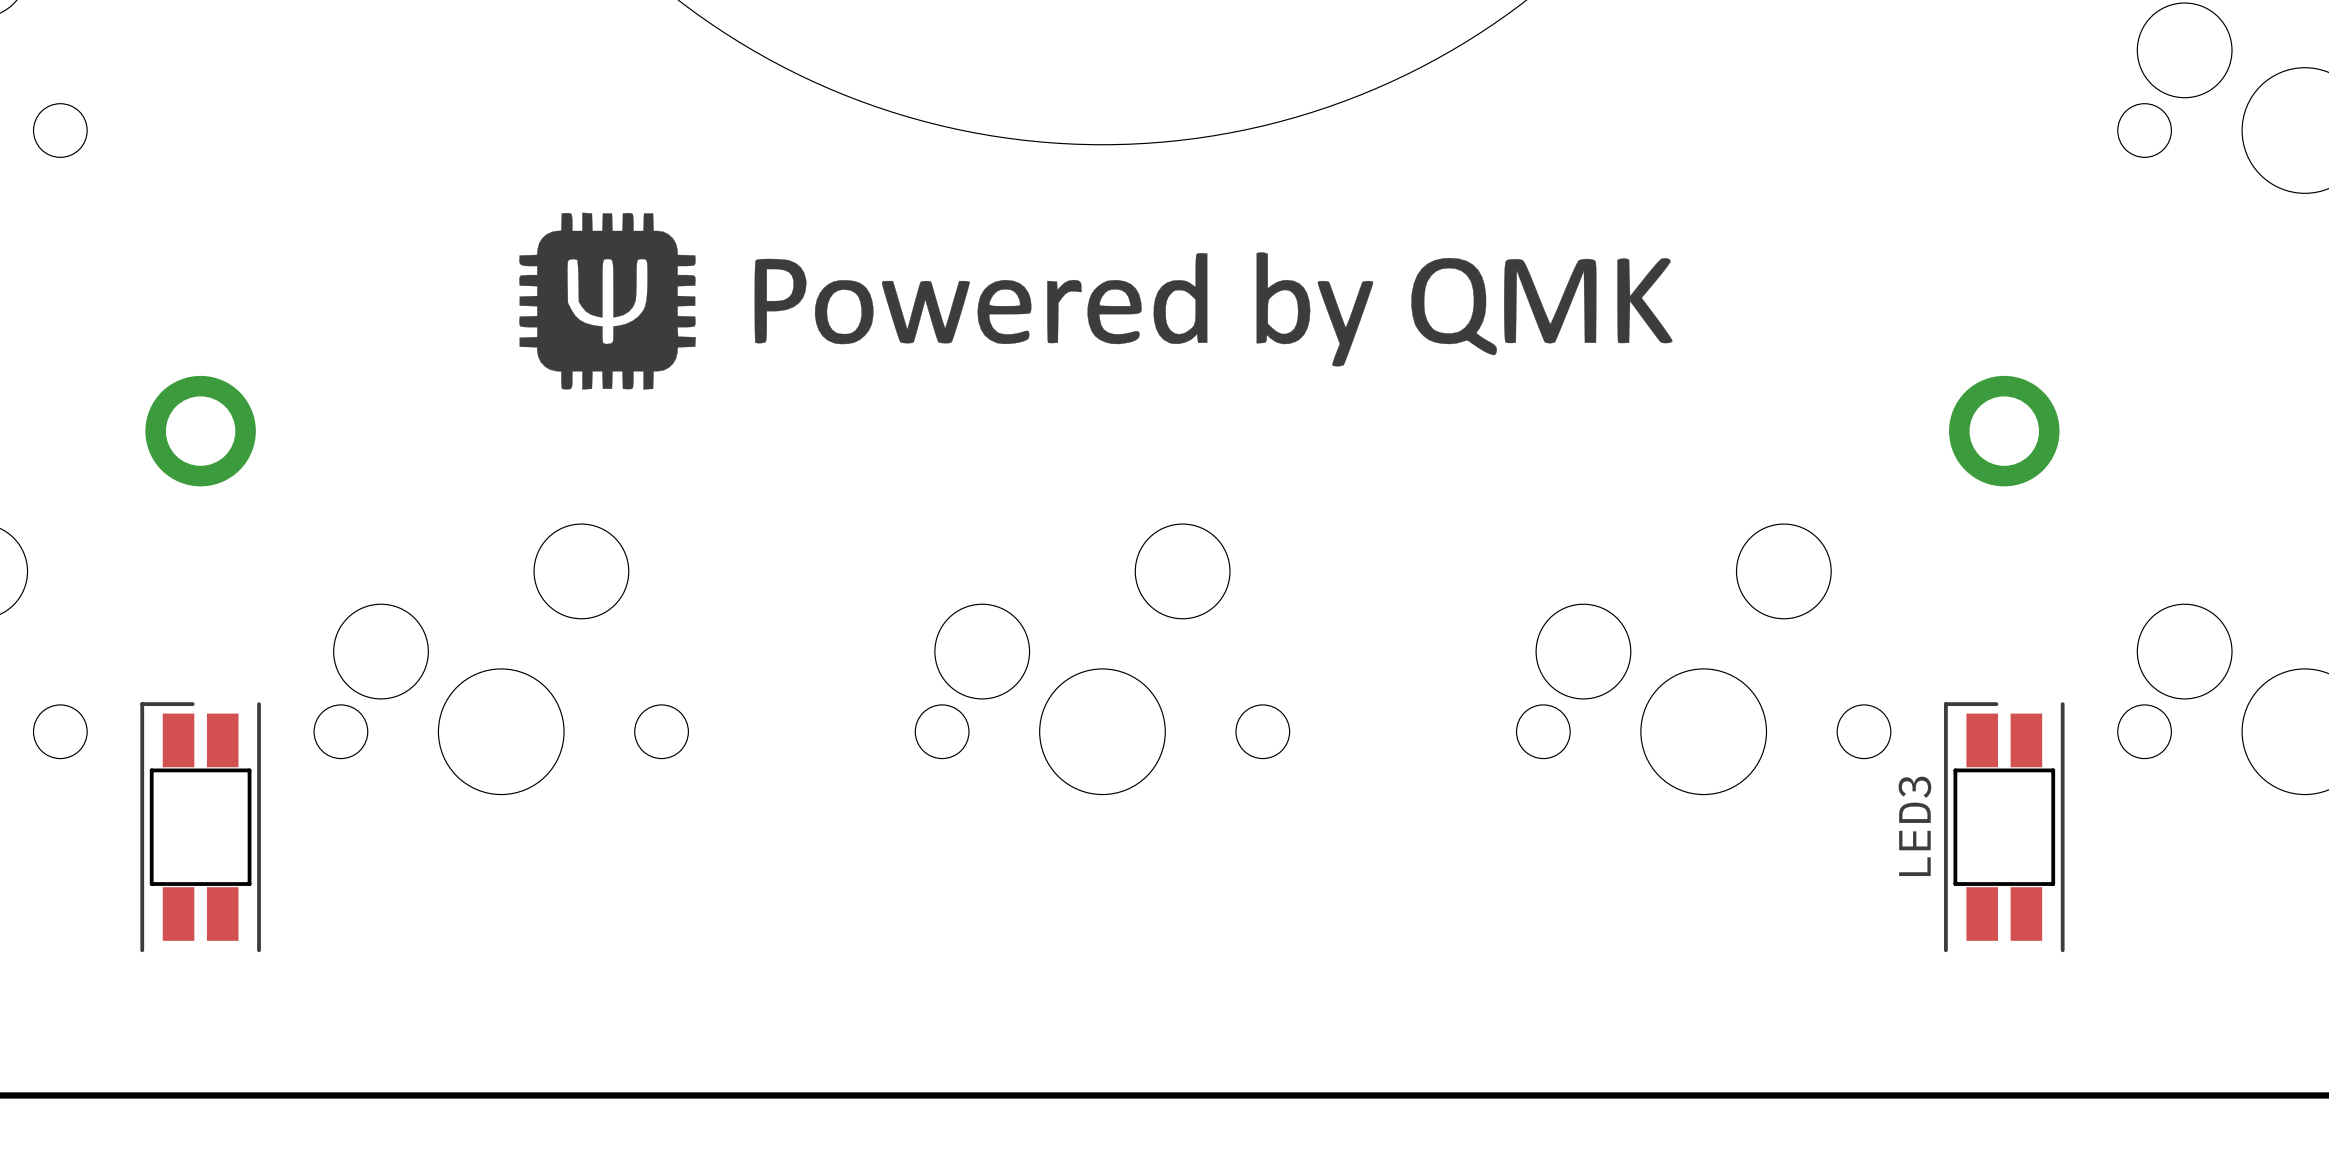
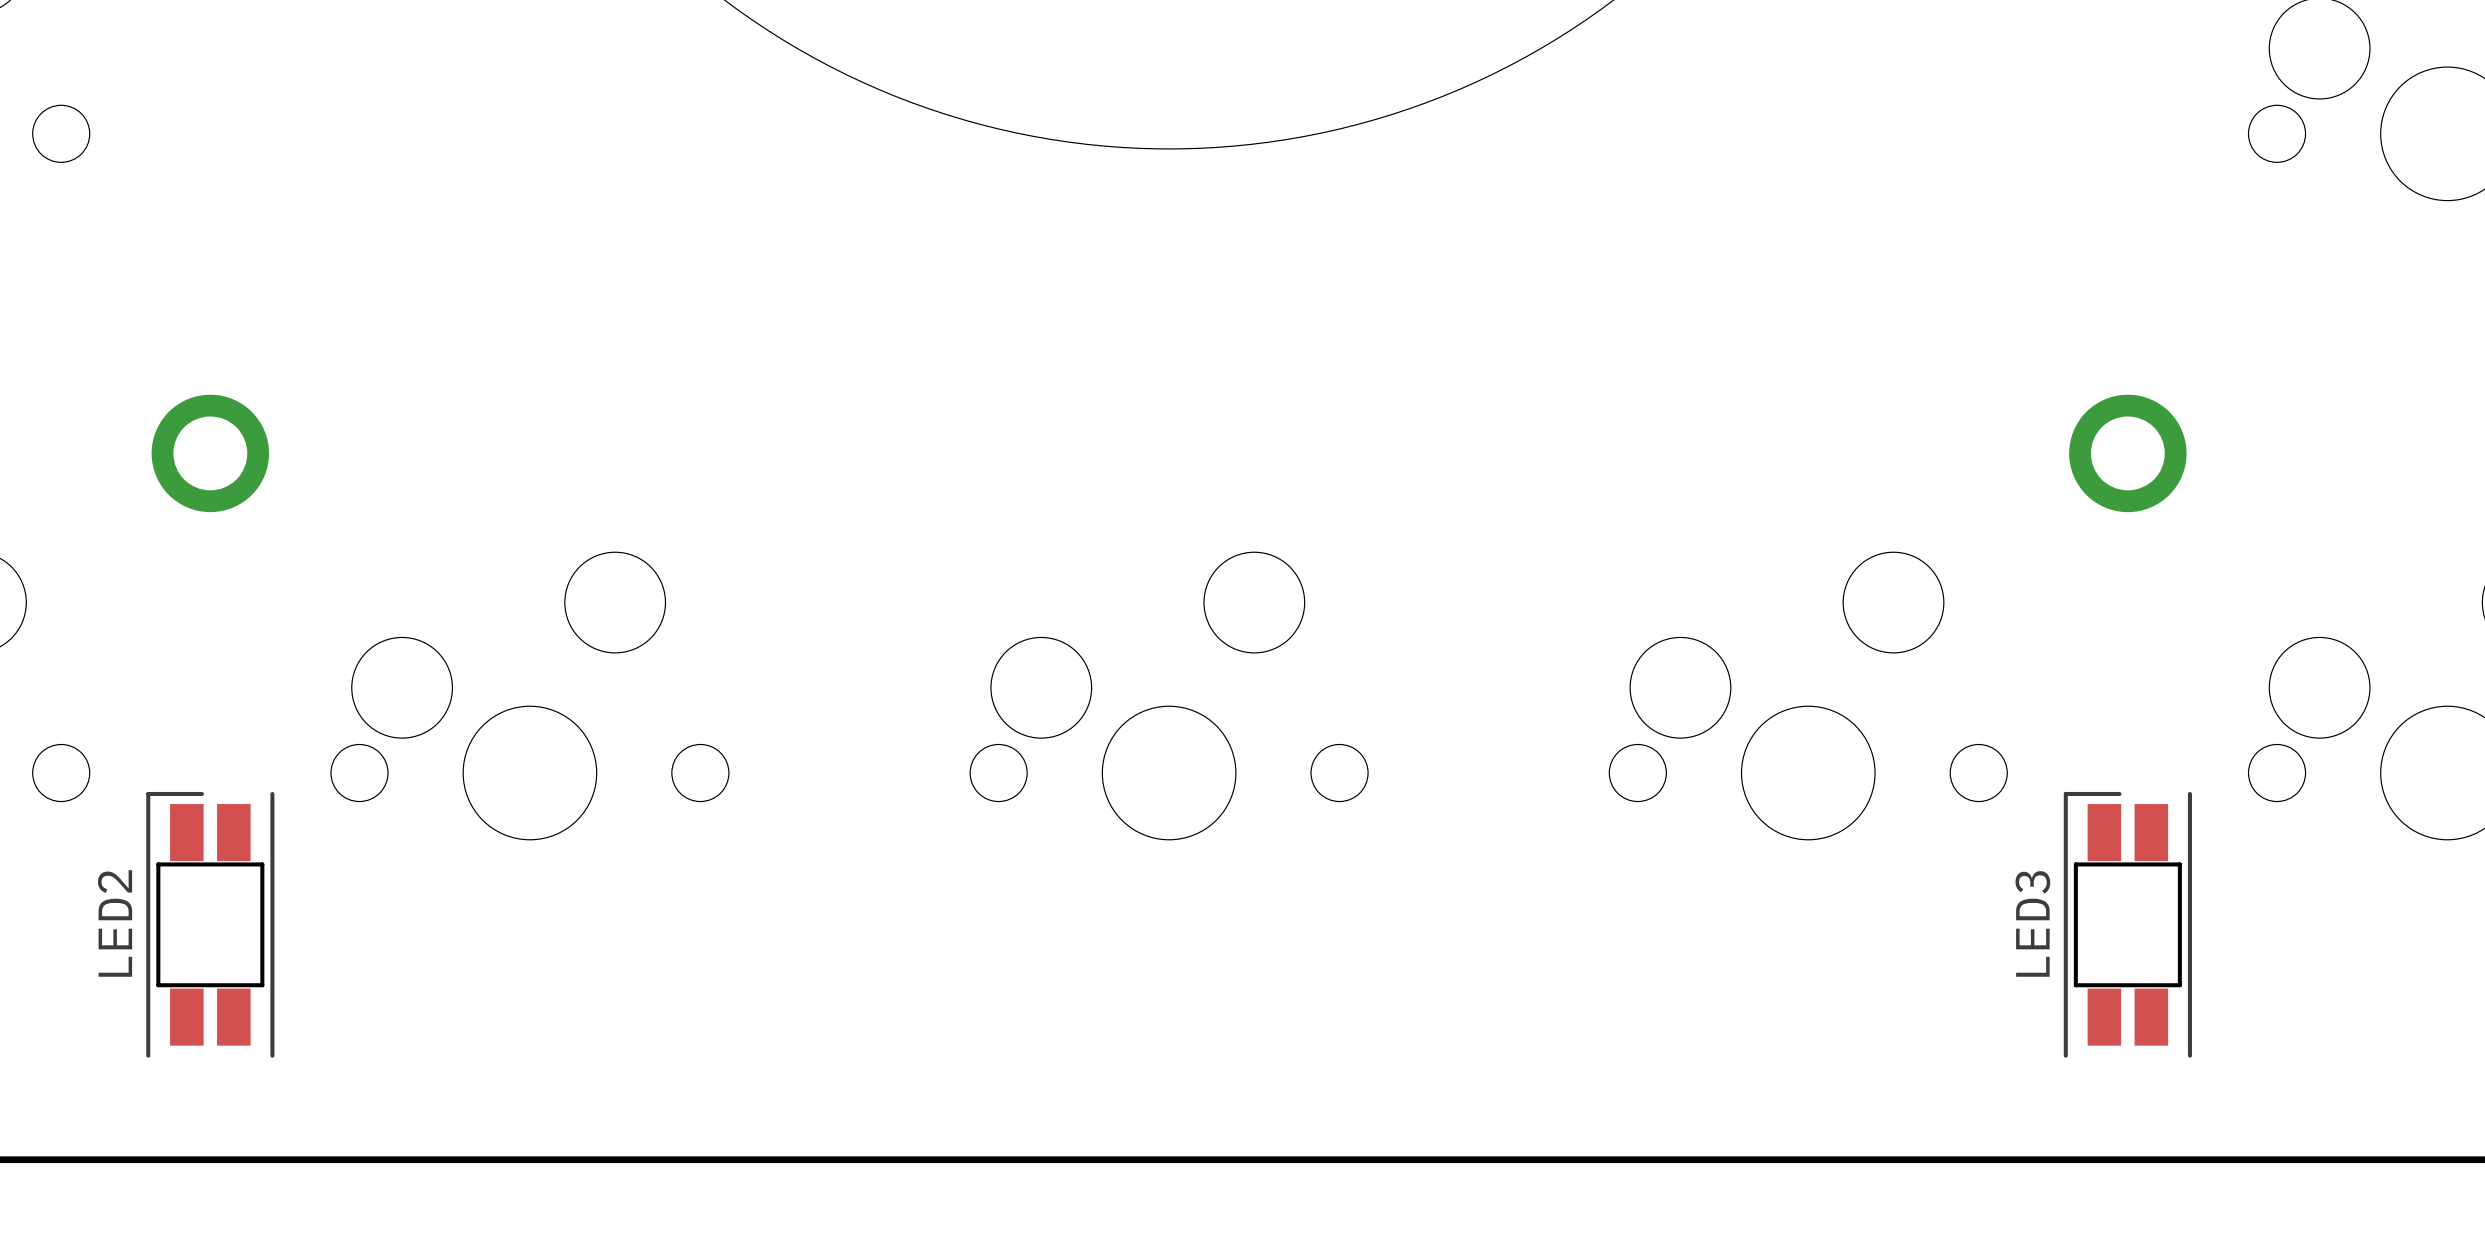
drawing: [519, 212, 1673, 390] -> none
part: (200, 827) -> none
LED3 position: (2004, 827) -> (2127, 924)
LED2: none -> (210, 924)

